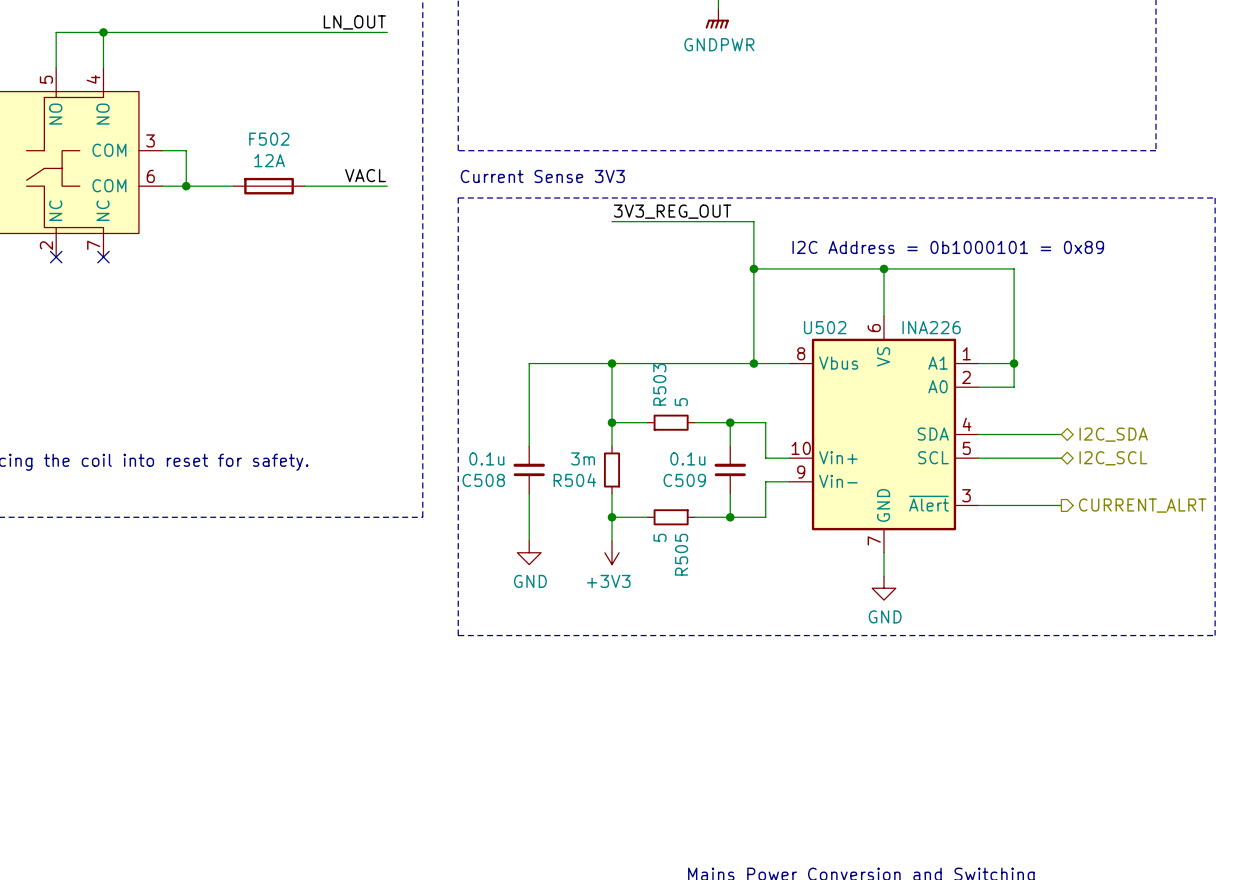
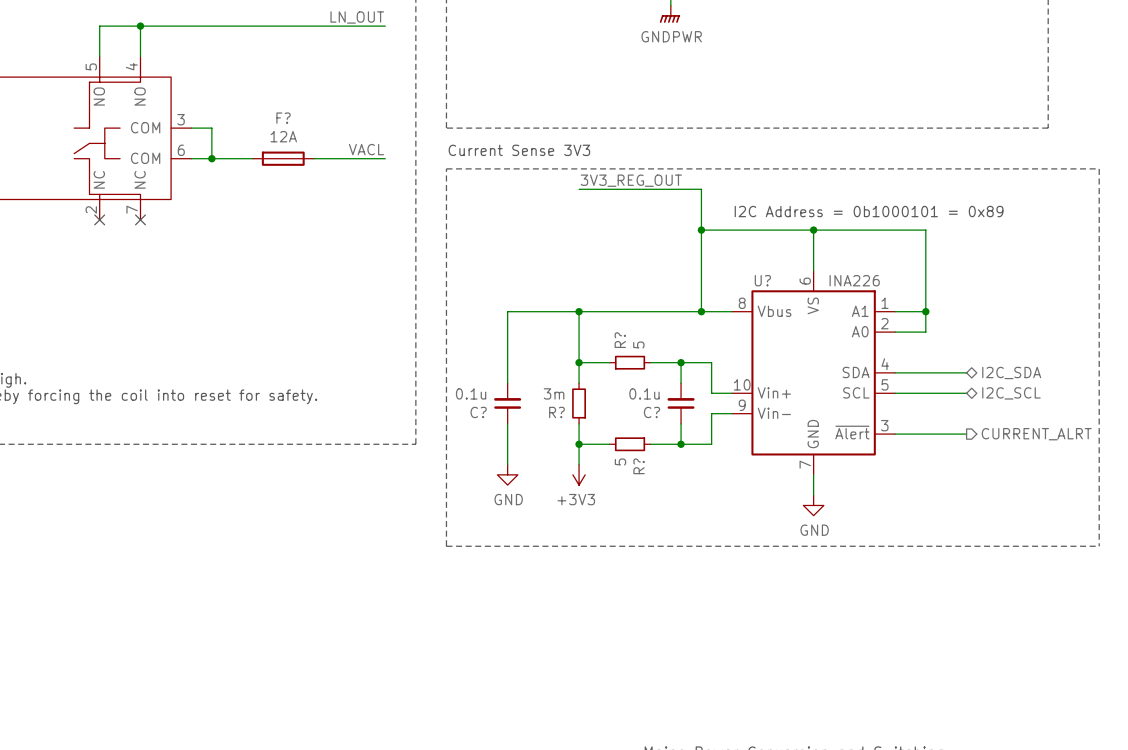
F502 name: F502 (269, 139) -> F? (283, 118)
U502 name: U502 (825, 327) -> U? (762, 280)
R503 name: R503 (659, 384) -> R? (620, 340)
C508 name: C508 (483, 480) -> C? (478, 412)
R504 name: R504 (574, 480) -> R? (556, 412)
C509 name: C509 (684, 480) -> C? (651, 412)
R505 name: R505 (681, 554) -> R? (639, 466)

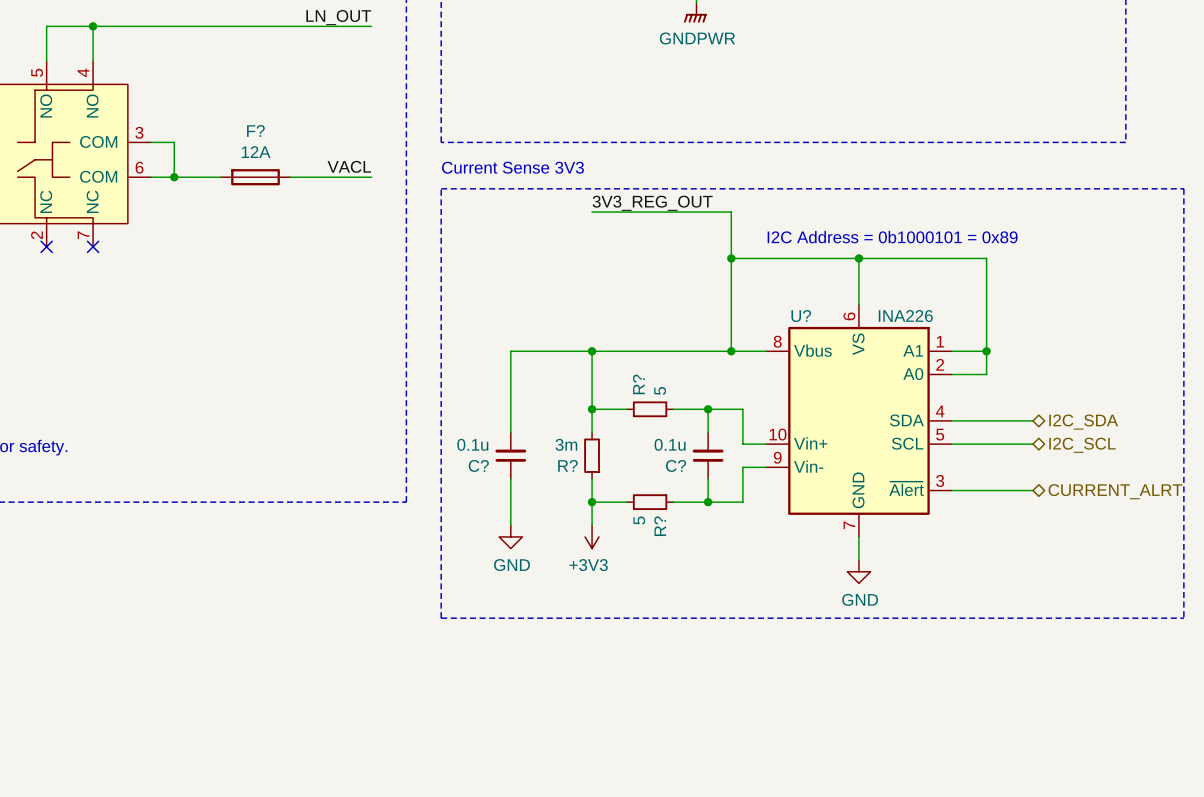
hierarchical label shape: output (1036, 434) -> bidirectional (1115, 491)

